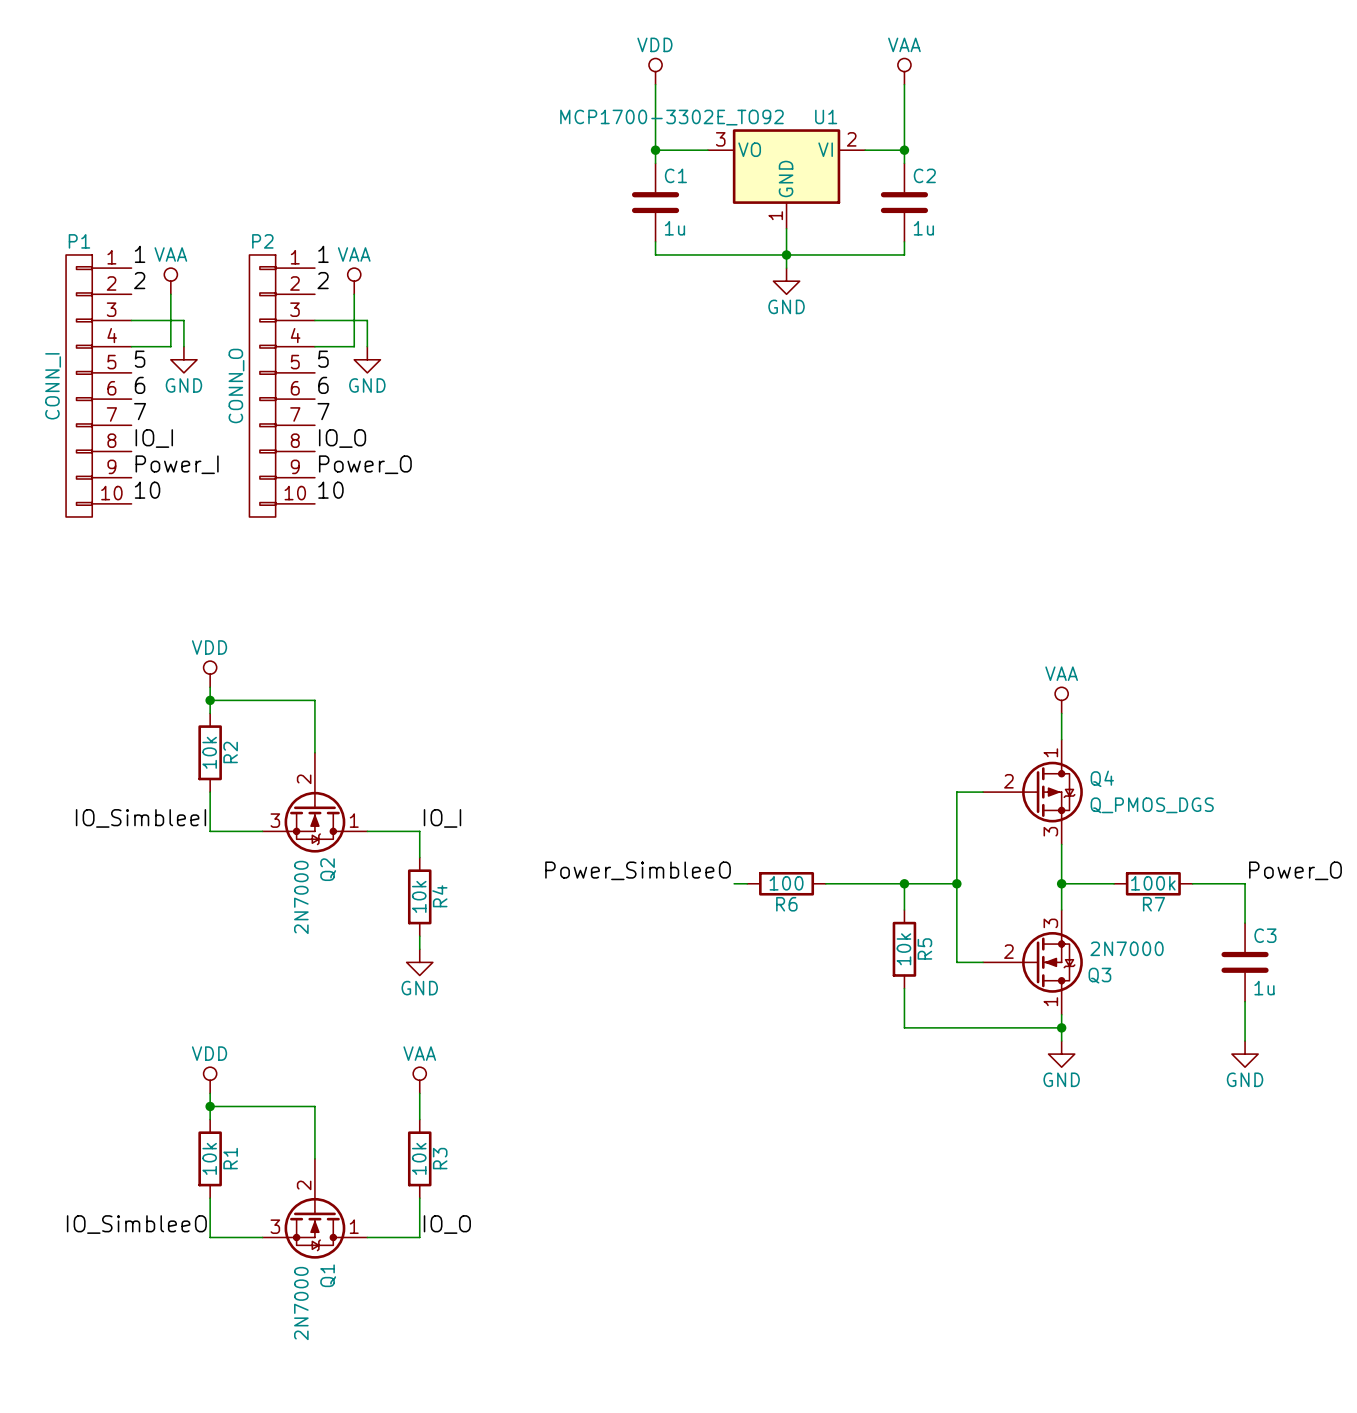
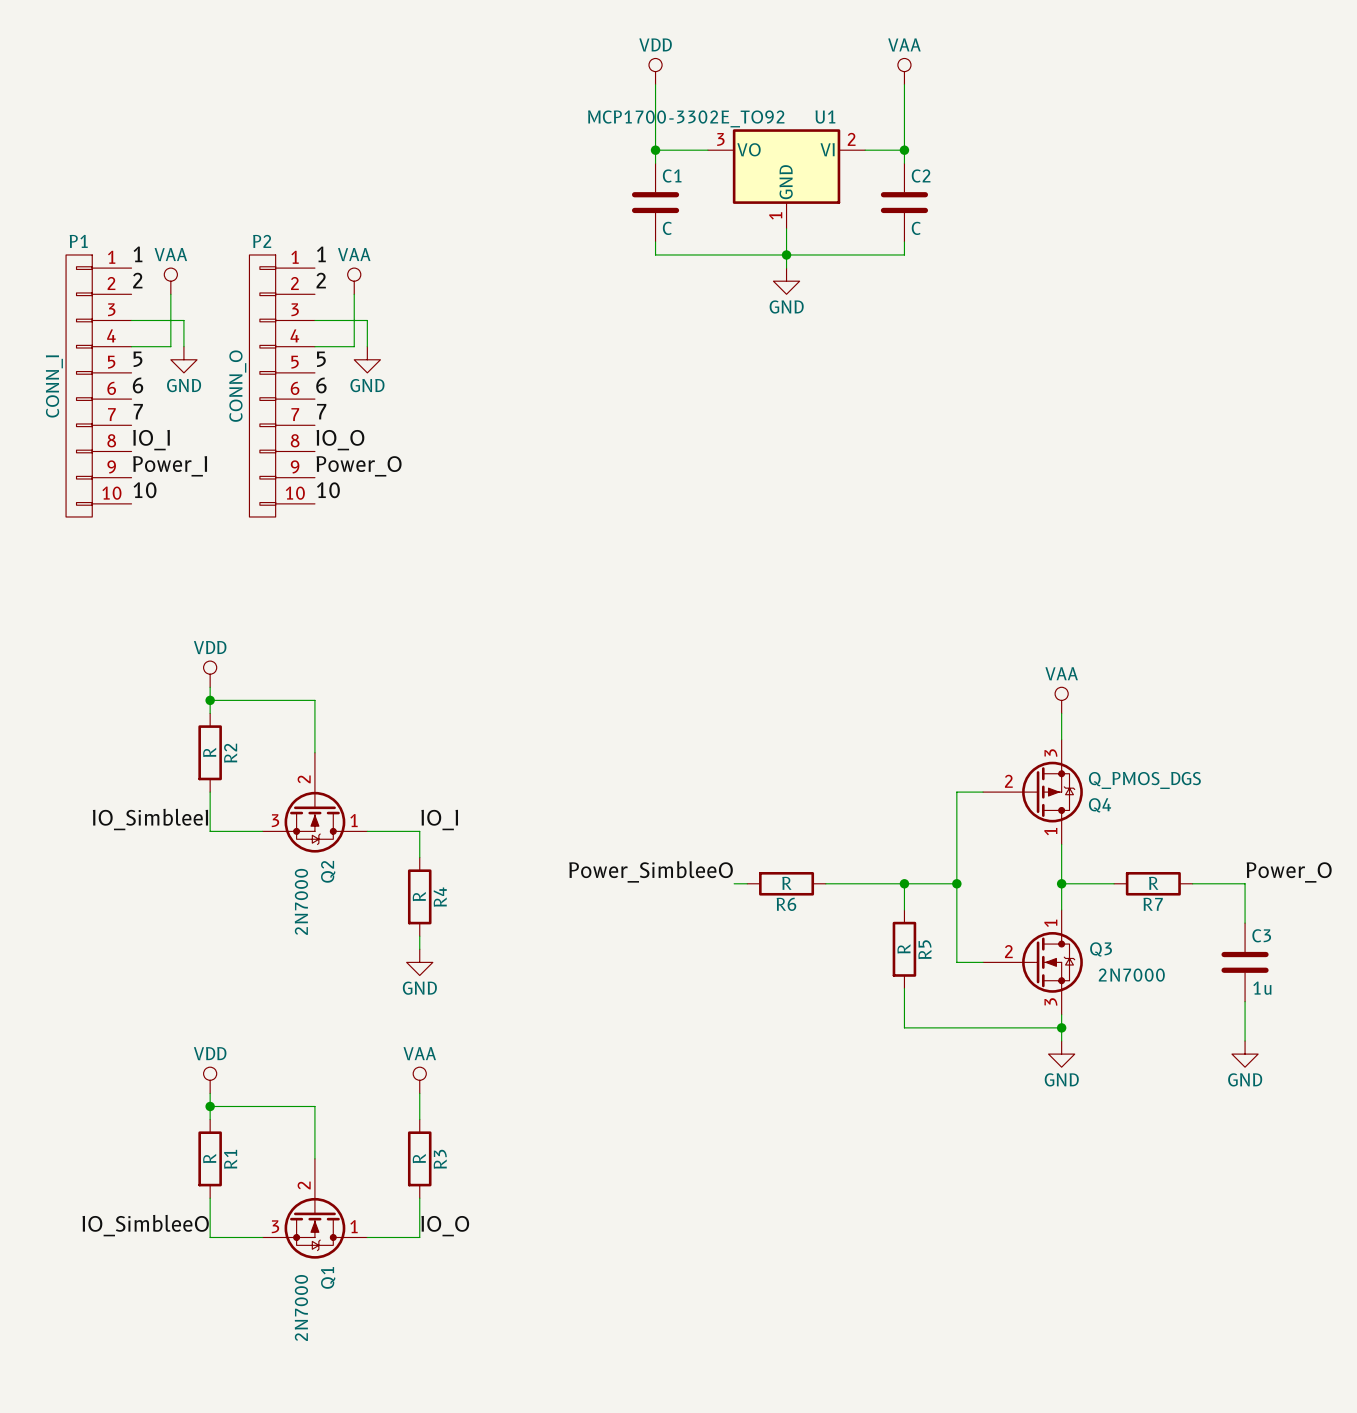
C1 value: 1u (674, 228) -> C (667, 228)
C2 value: 1u (923, 228) -> C (916, 228)
R2 value: 10k (209, 752) -> R (209, 752)
Q4 flip: as is (1052, 792) -> up-down (1052, 792)
R6 value: 100 (786, 883) -> R (786, 883)
R7 value: 100k (1153, 883) -> R (1153, 883)
R4 value: 10k (419, 896) -> R (419, 896)
R5 value: 10k (903, 949) -> R (903, 948)
Q3 flip: as is (1052, 962) -> up-down (1052, 962)
R1 value: 10k (209, 1158) -> R (209, 1158)
R3 value: 10k (419, 1158) -> R (419, 1158)

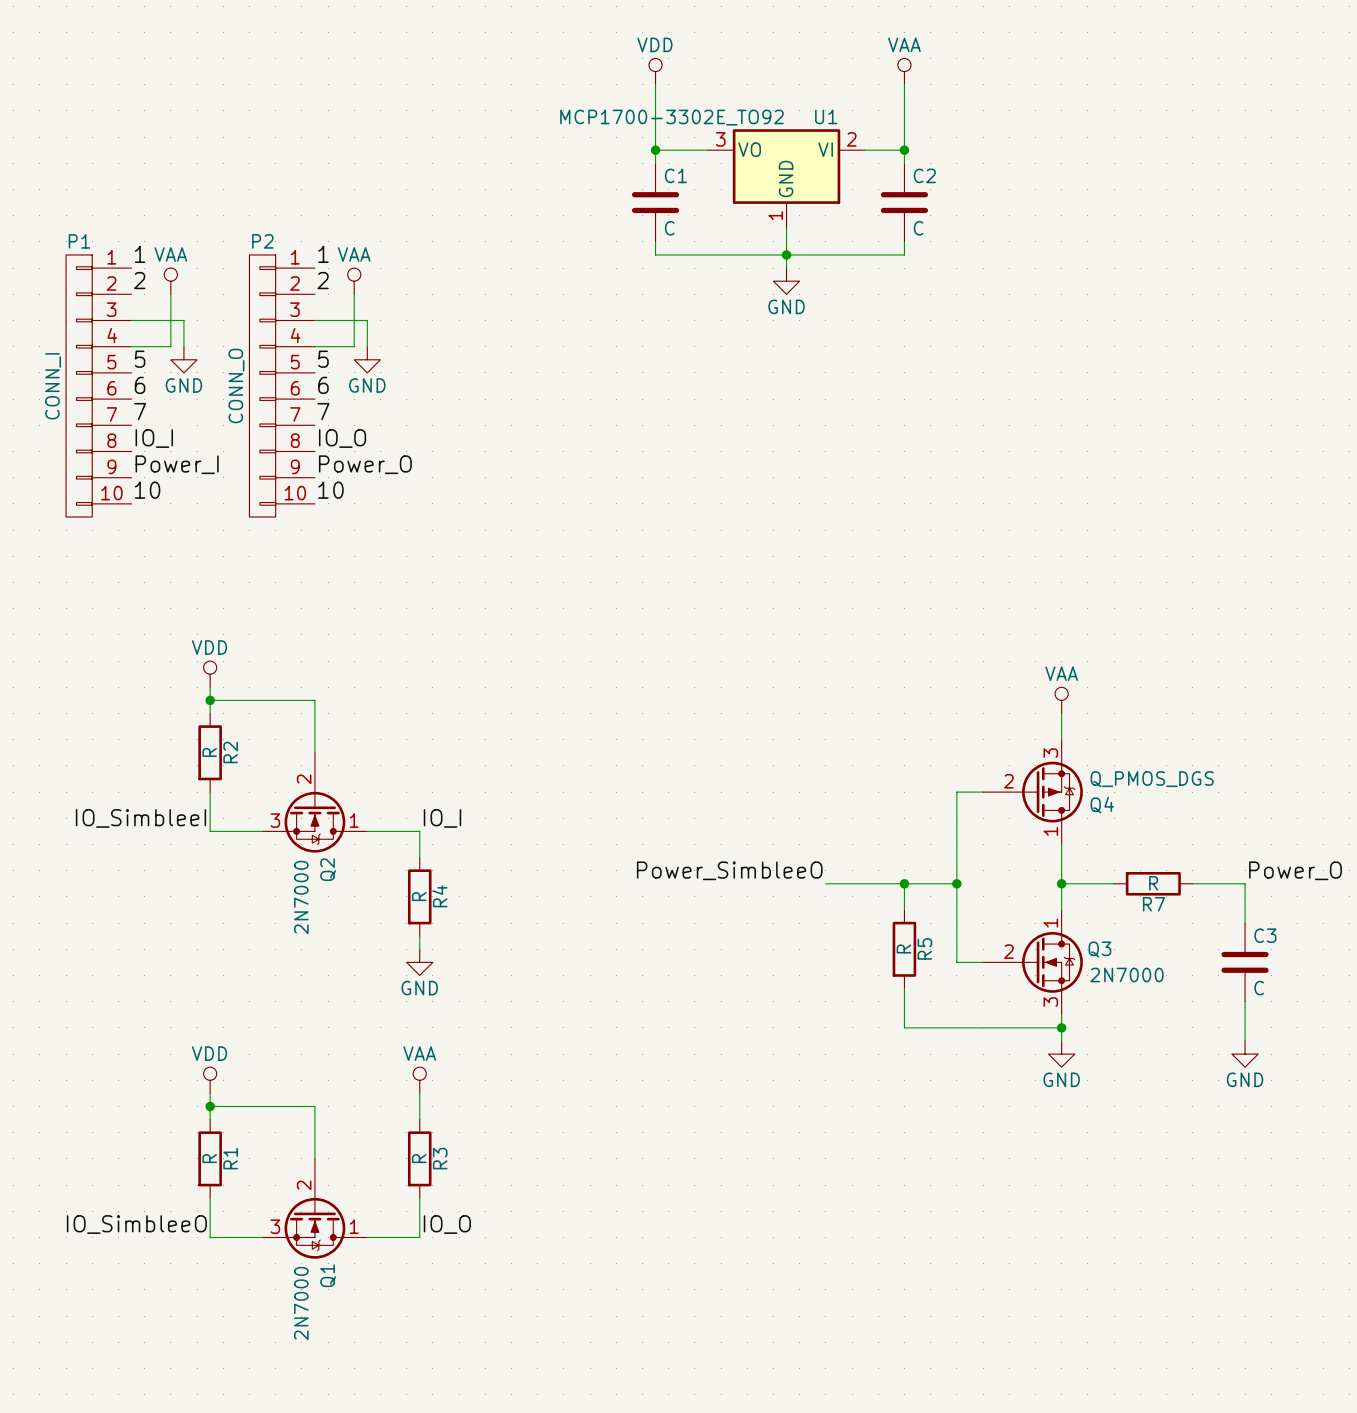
label position: Power_SimbleeO (651, 871) -> Power_SimbleeO (729, 870)
wire: (734, 883) (747, 883) -> none
R6: R (786, 883) -> none
C3 value: 1u (1262, 988) -> C (1259, 988)

